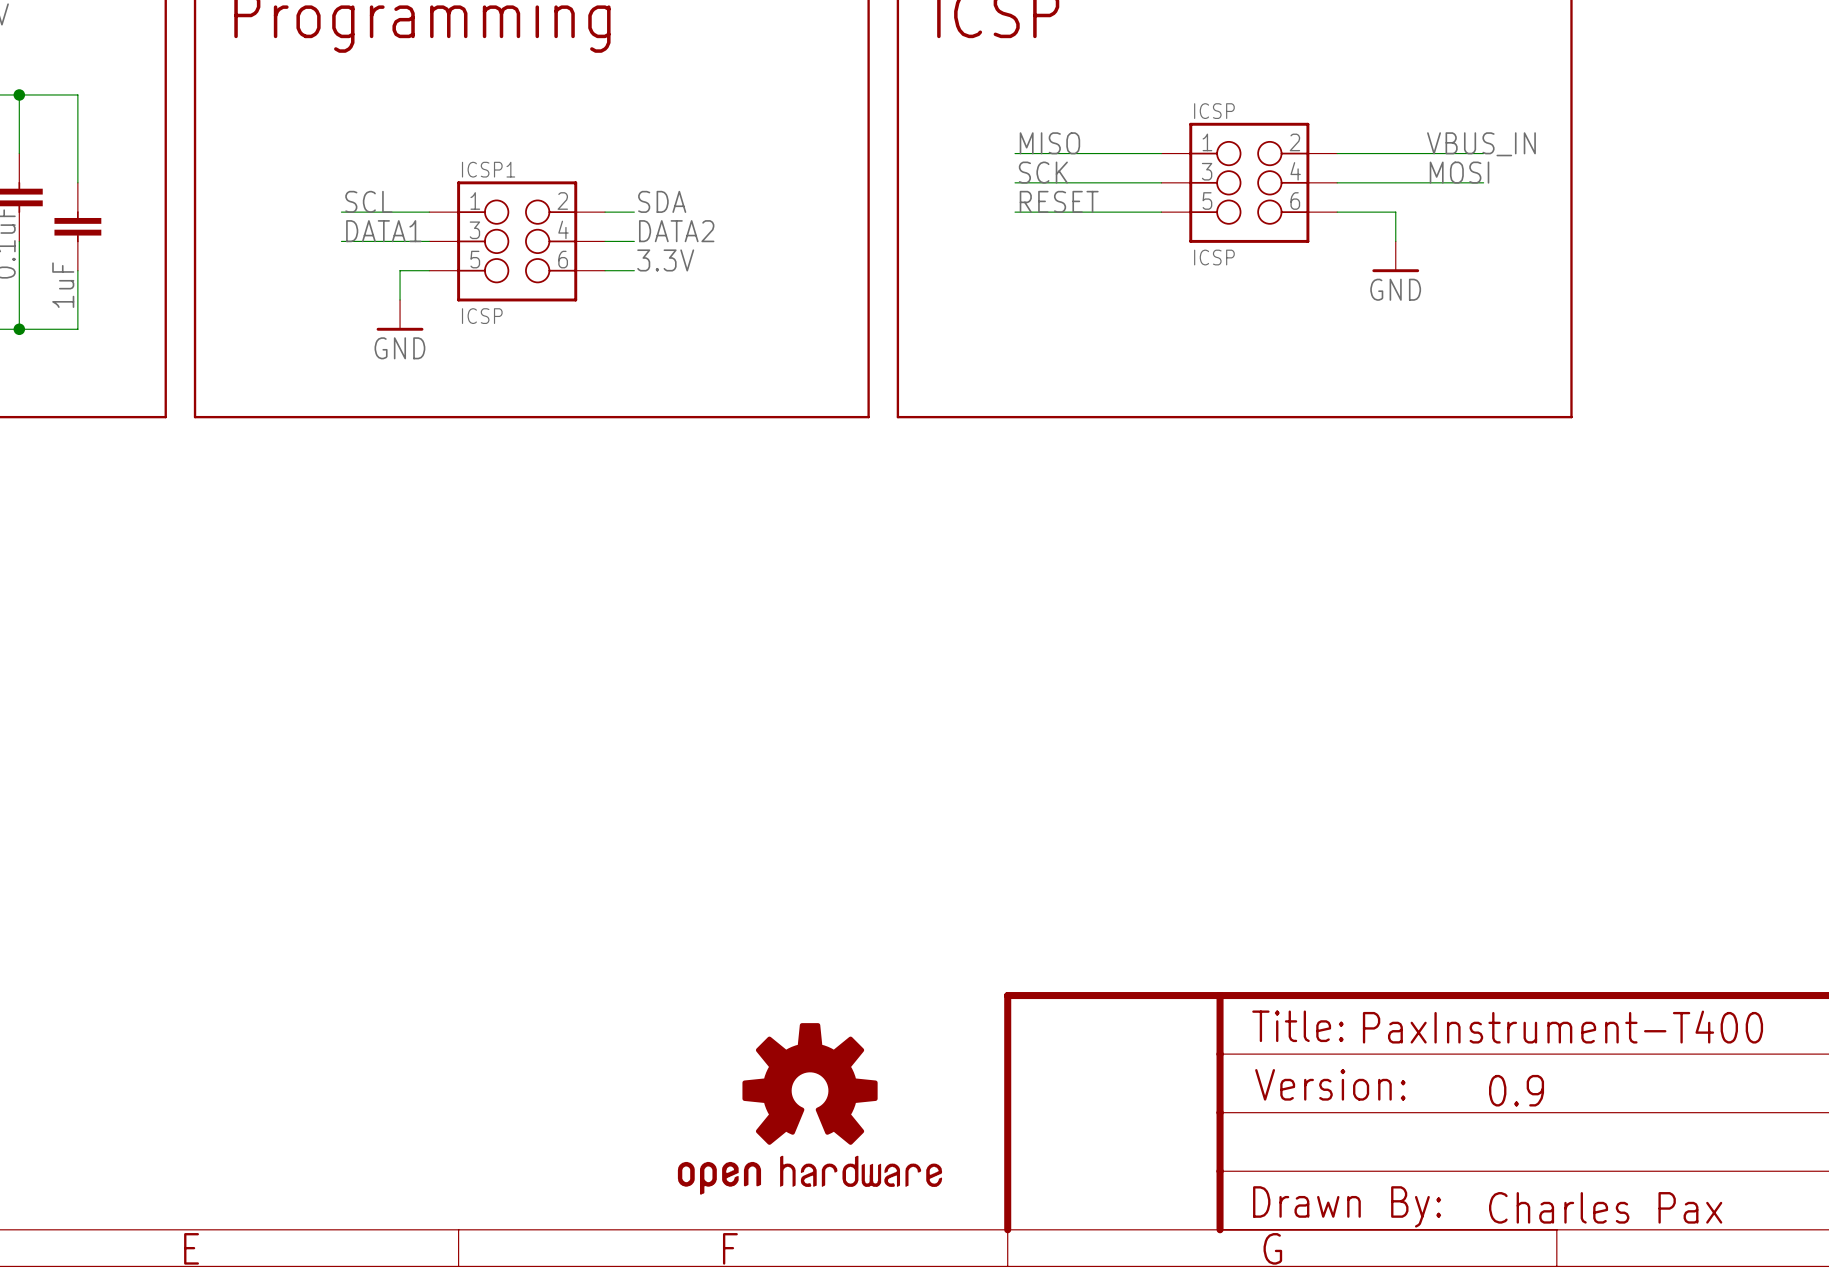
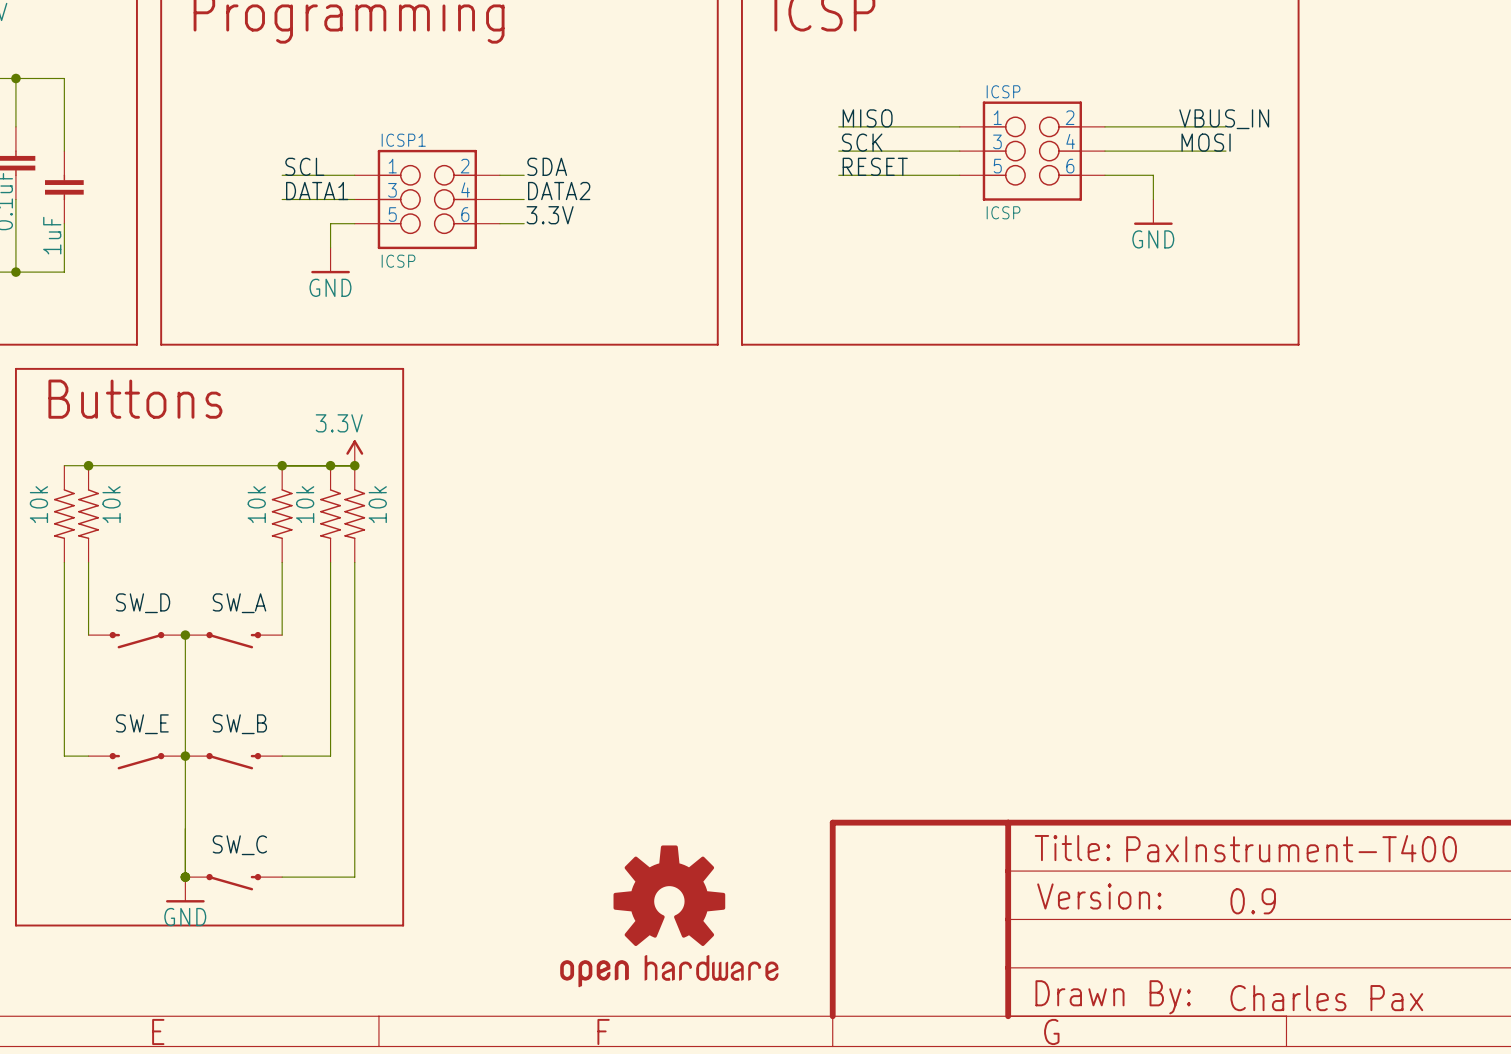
line: none -> (15, 368) (403, 368) (403, 925) (15, 925) (15, 368)
text: none -> Buttons (135, 399)
power symbol: none -> 3.3V (354, 452)
wire: none -> (64, 465) (354, 465)
junction: none -> (88, 465)
junction: none -> (282, 465)
junction: none -> (330, 465)
junction: none -> (354, 465)
part: none -> 10k (64, 514)
part: none -> 10k (88, 514)
part: none -> 10k (282, 514)
part: none -> 10k (330, 514)
part: none -> 10k (354, 514)
wire: none -> (64, 562) (64, 756) (88, 756)
wire: none -> (88, 562) (88, 635)
wire: none -> (282, 562) (282, 635)
wire: none -> (330, 562) (330, 756) (282, 756)
wire: none -> (354, 562) (354, 877) (282, 877)
label: none -> SW_D (143, 603)
label: none -> SW_A (239, 603)
wire: none -> (185, 635) (185, 877)
junction: none -> (185, 635)
part: none -> (136, 640)
part: none -> (233, 640)
label: none -> SW_E (142, 724)
label: none -> SW_B (239, 724)
junction: none -> (185, 756)
part: none -> (136, 761)
part: none -> (233, 761)
label: none -> SW_C (239, 845)
junction: none -> (185, 877)
part: none -> (233, 882)
power symbol: none -> GND (185, 889)

